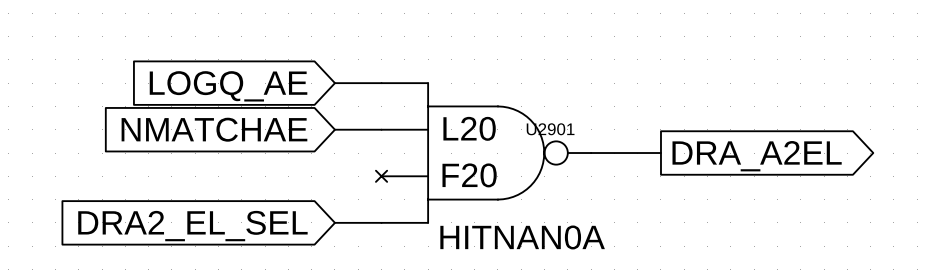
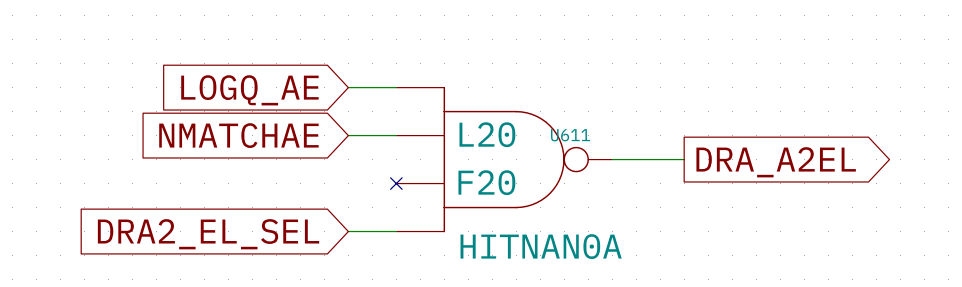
U2901 name: U2901 (550, 129) -> U611 (570, 135)

